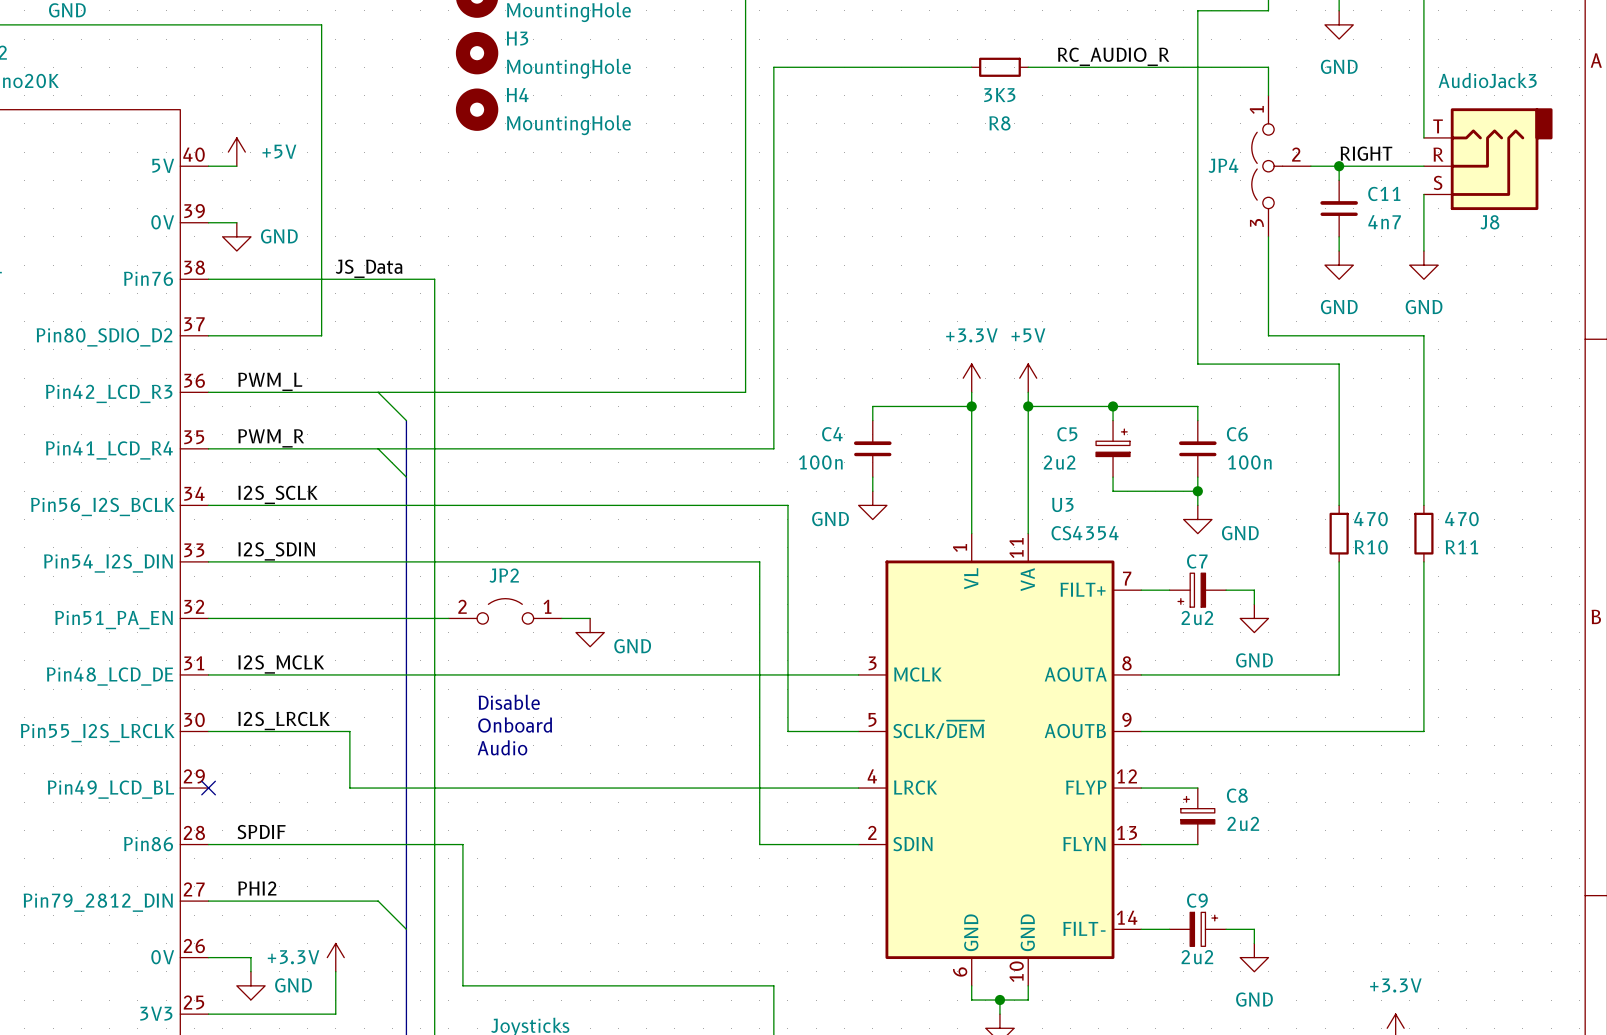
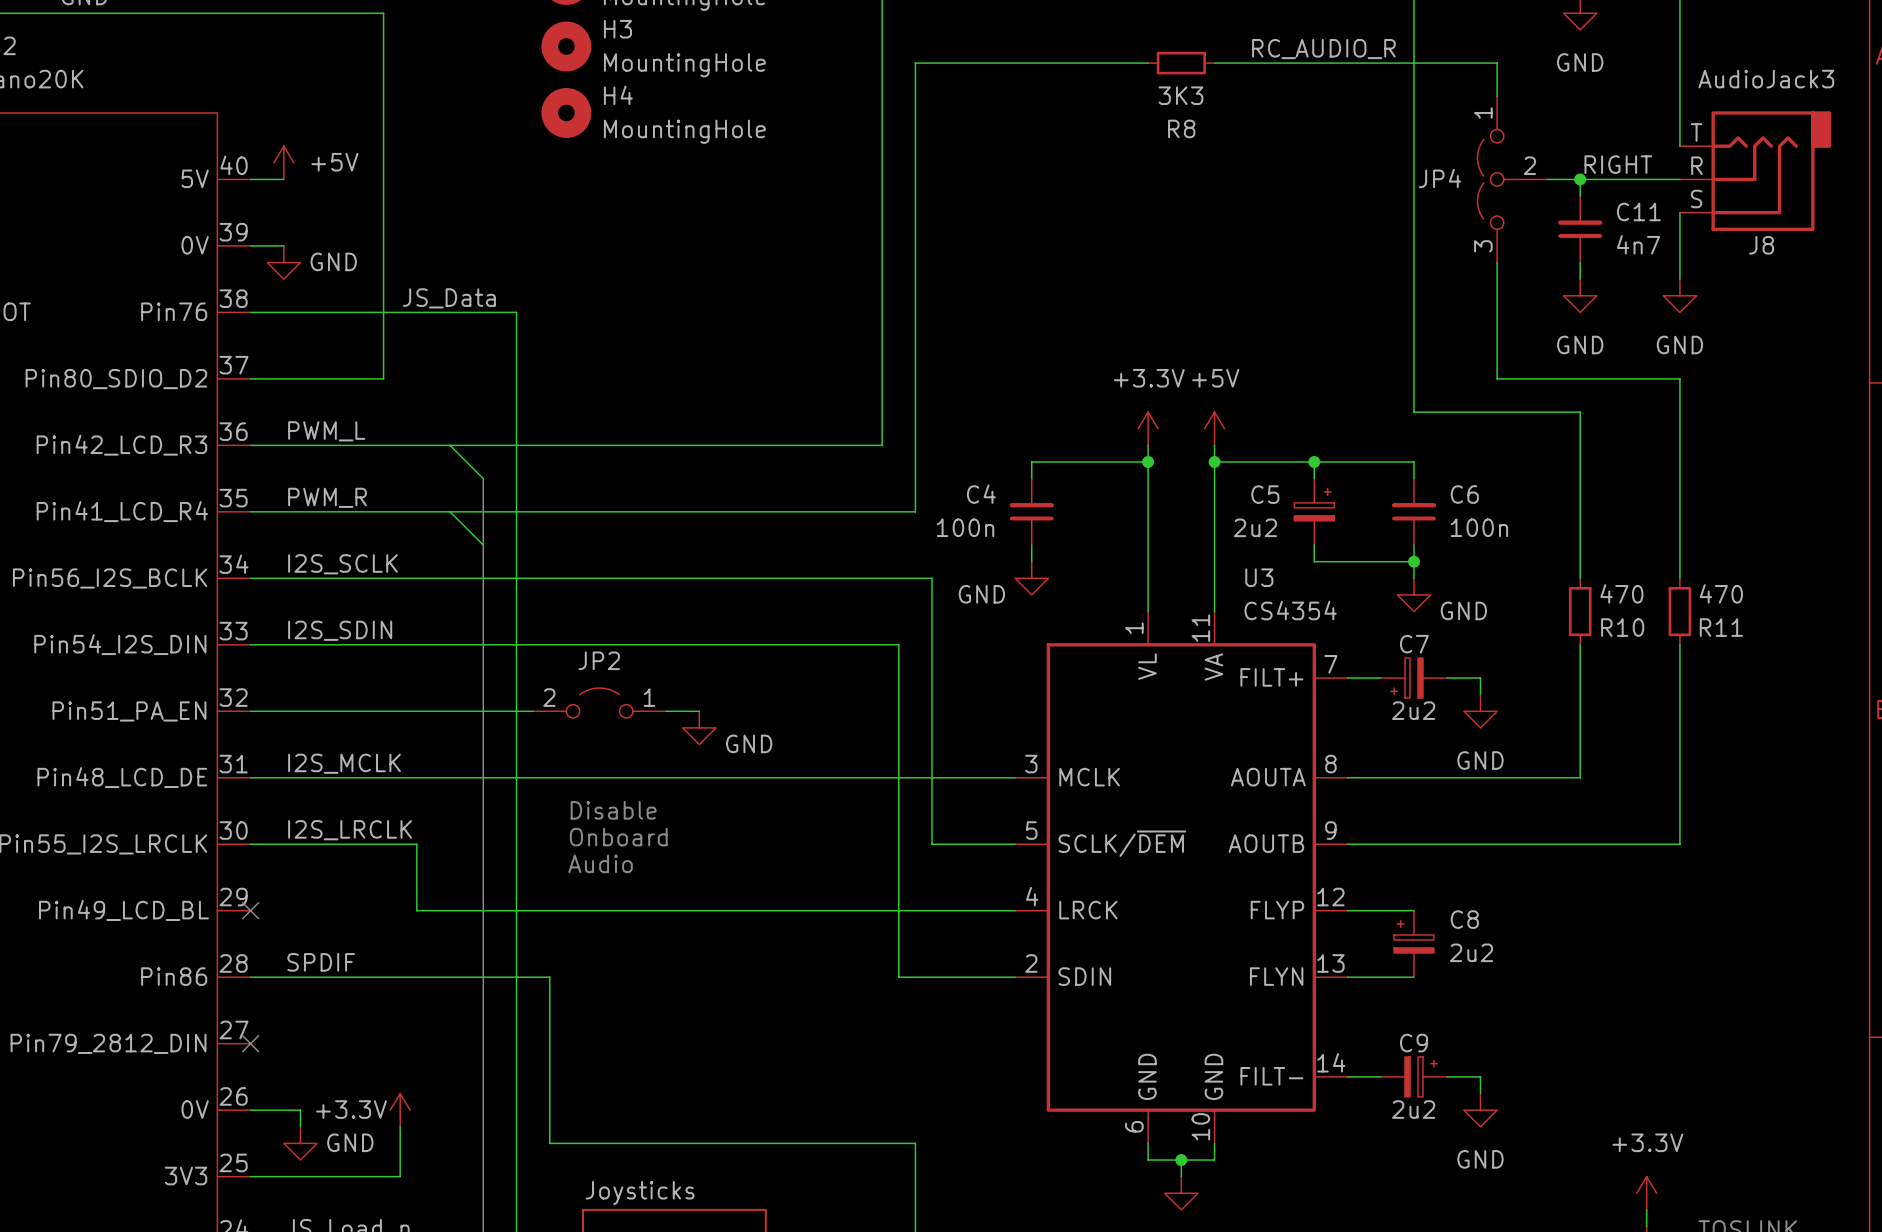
label: PHI2 (257, 888) -> none
wire: (208, 901) (378, 901) (406, 929) -> none
no-connect mark: none -> (250, 1043)

